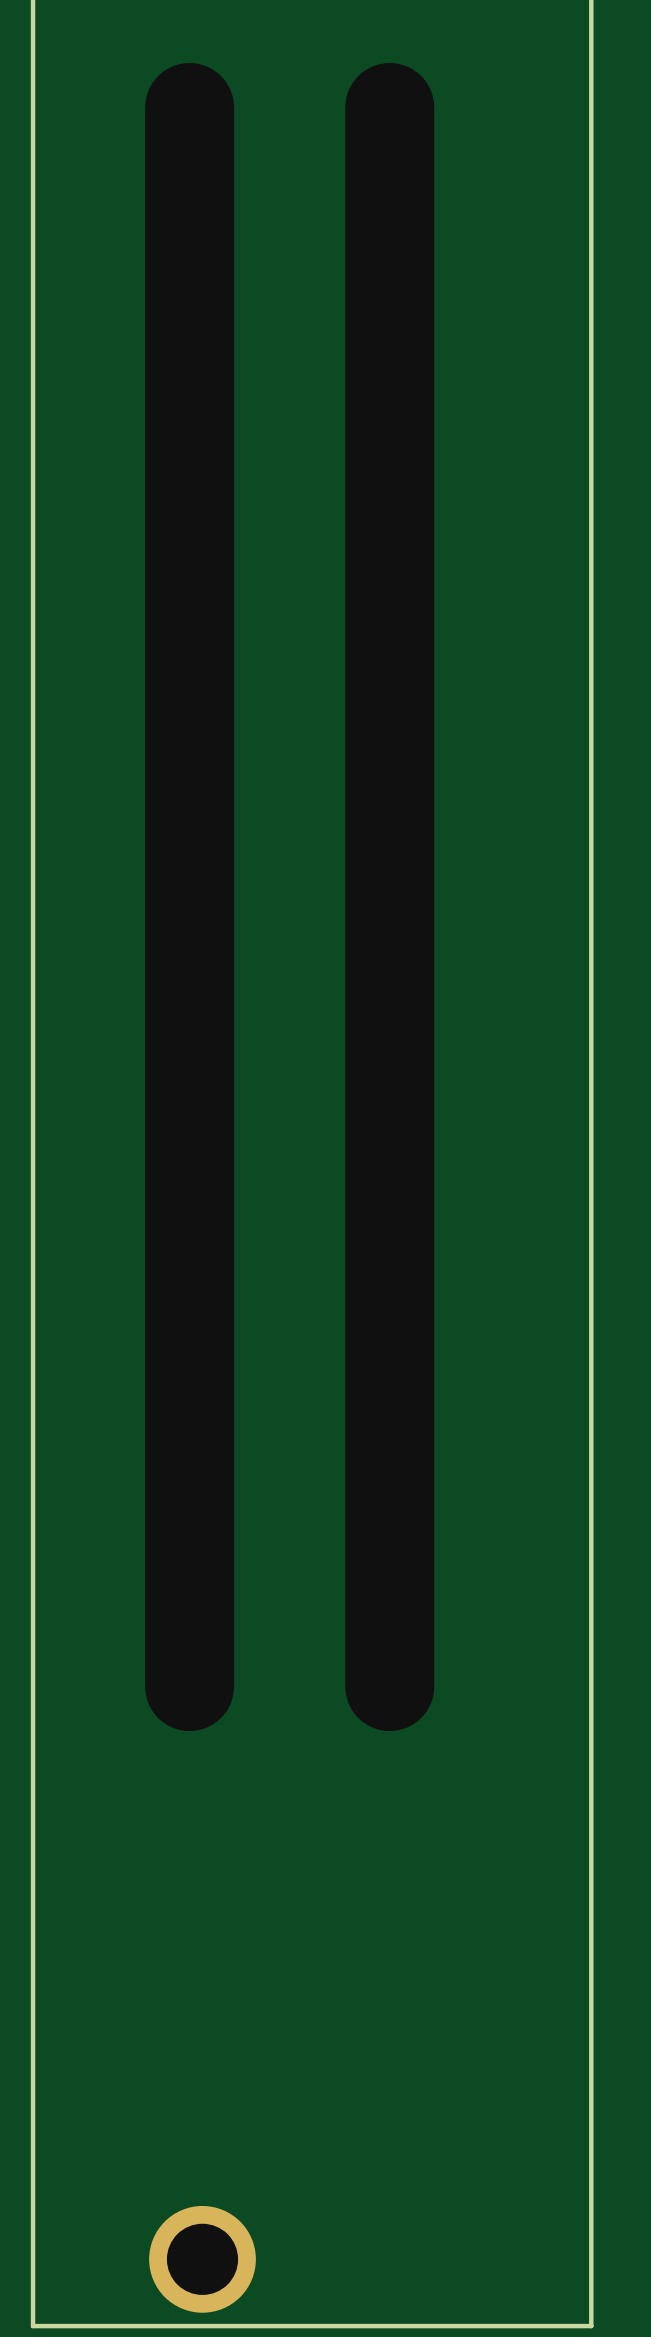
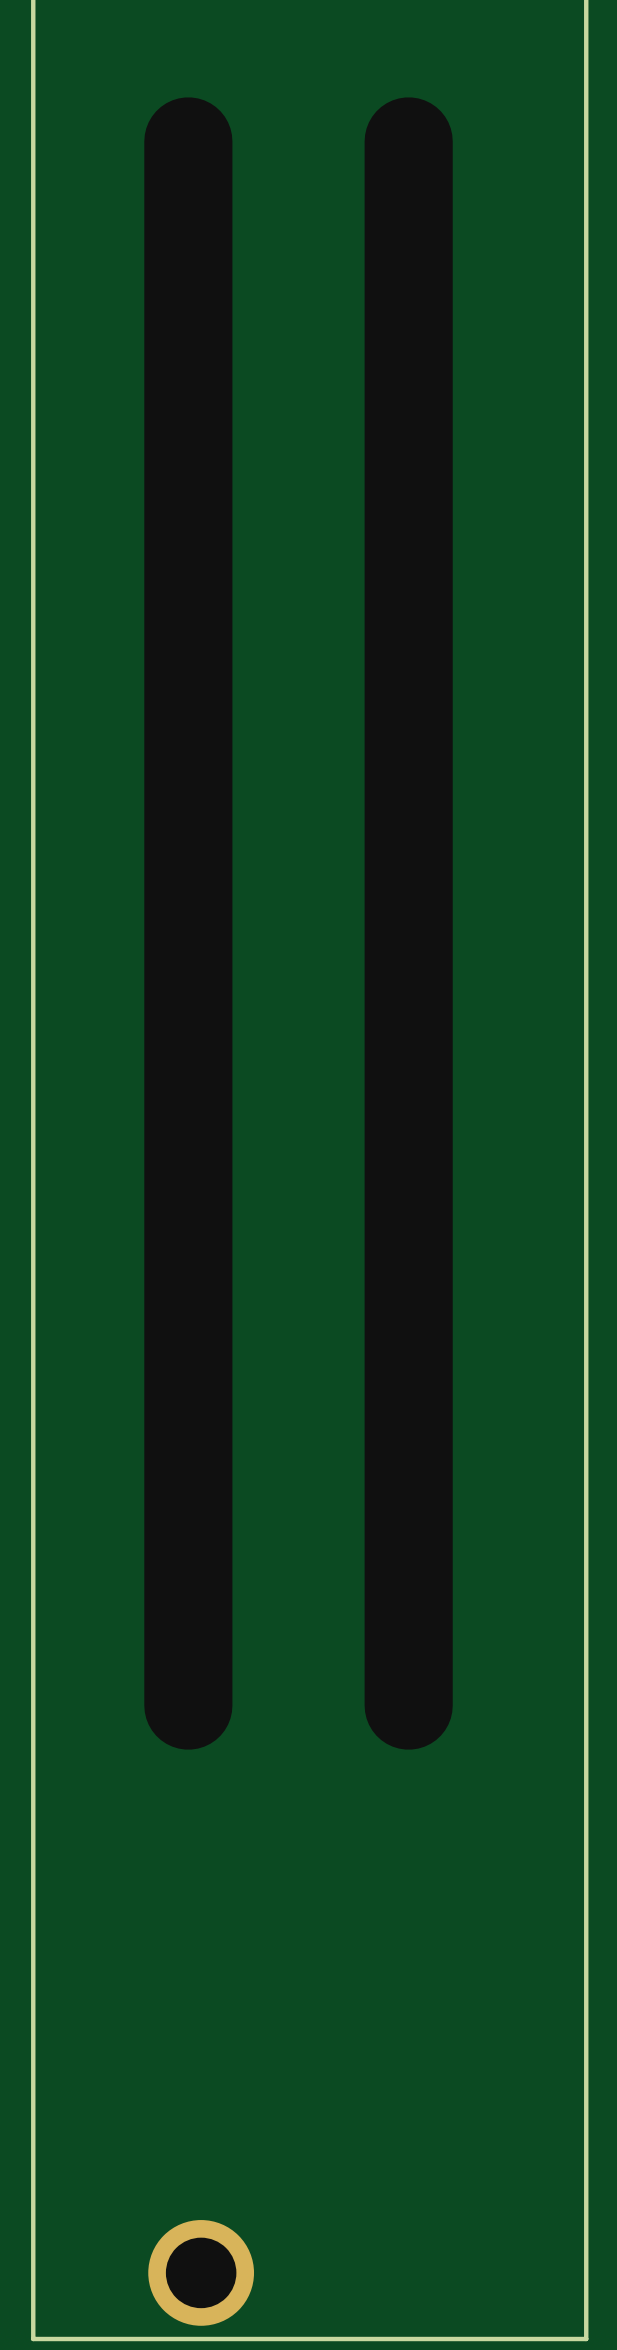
part position: (389, 897) -> (408, 923)

